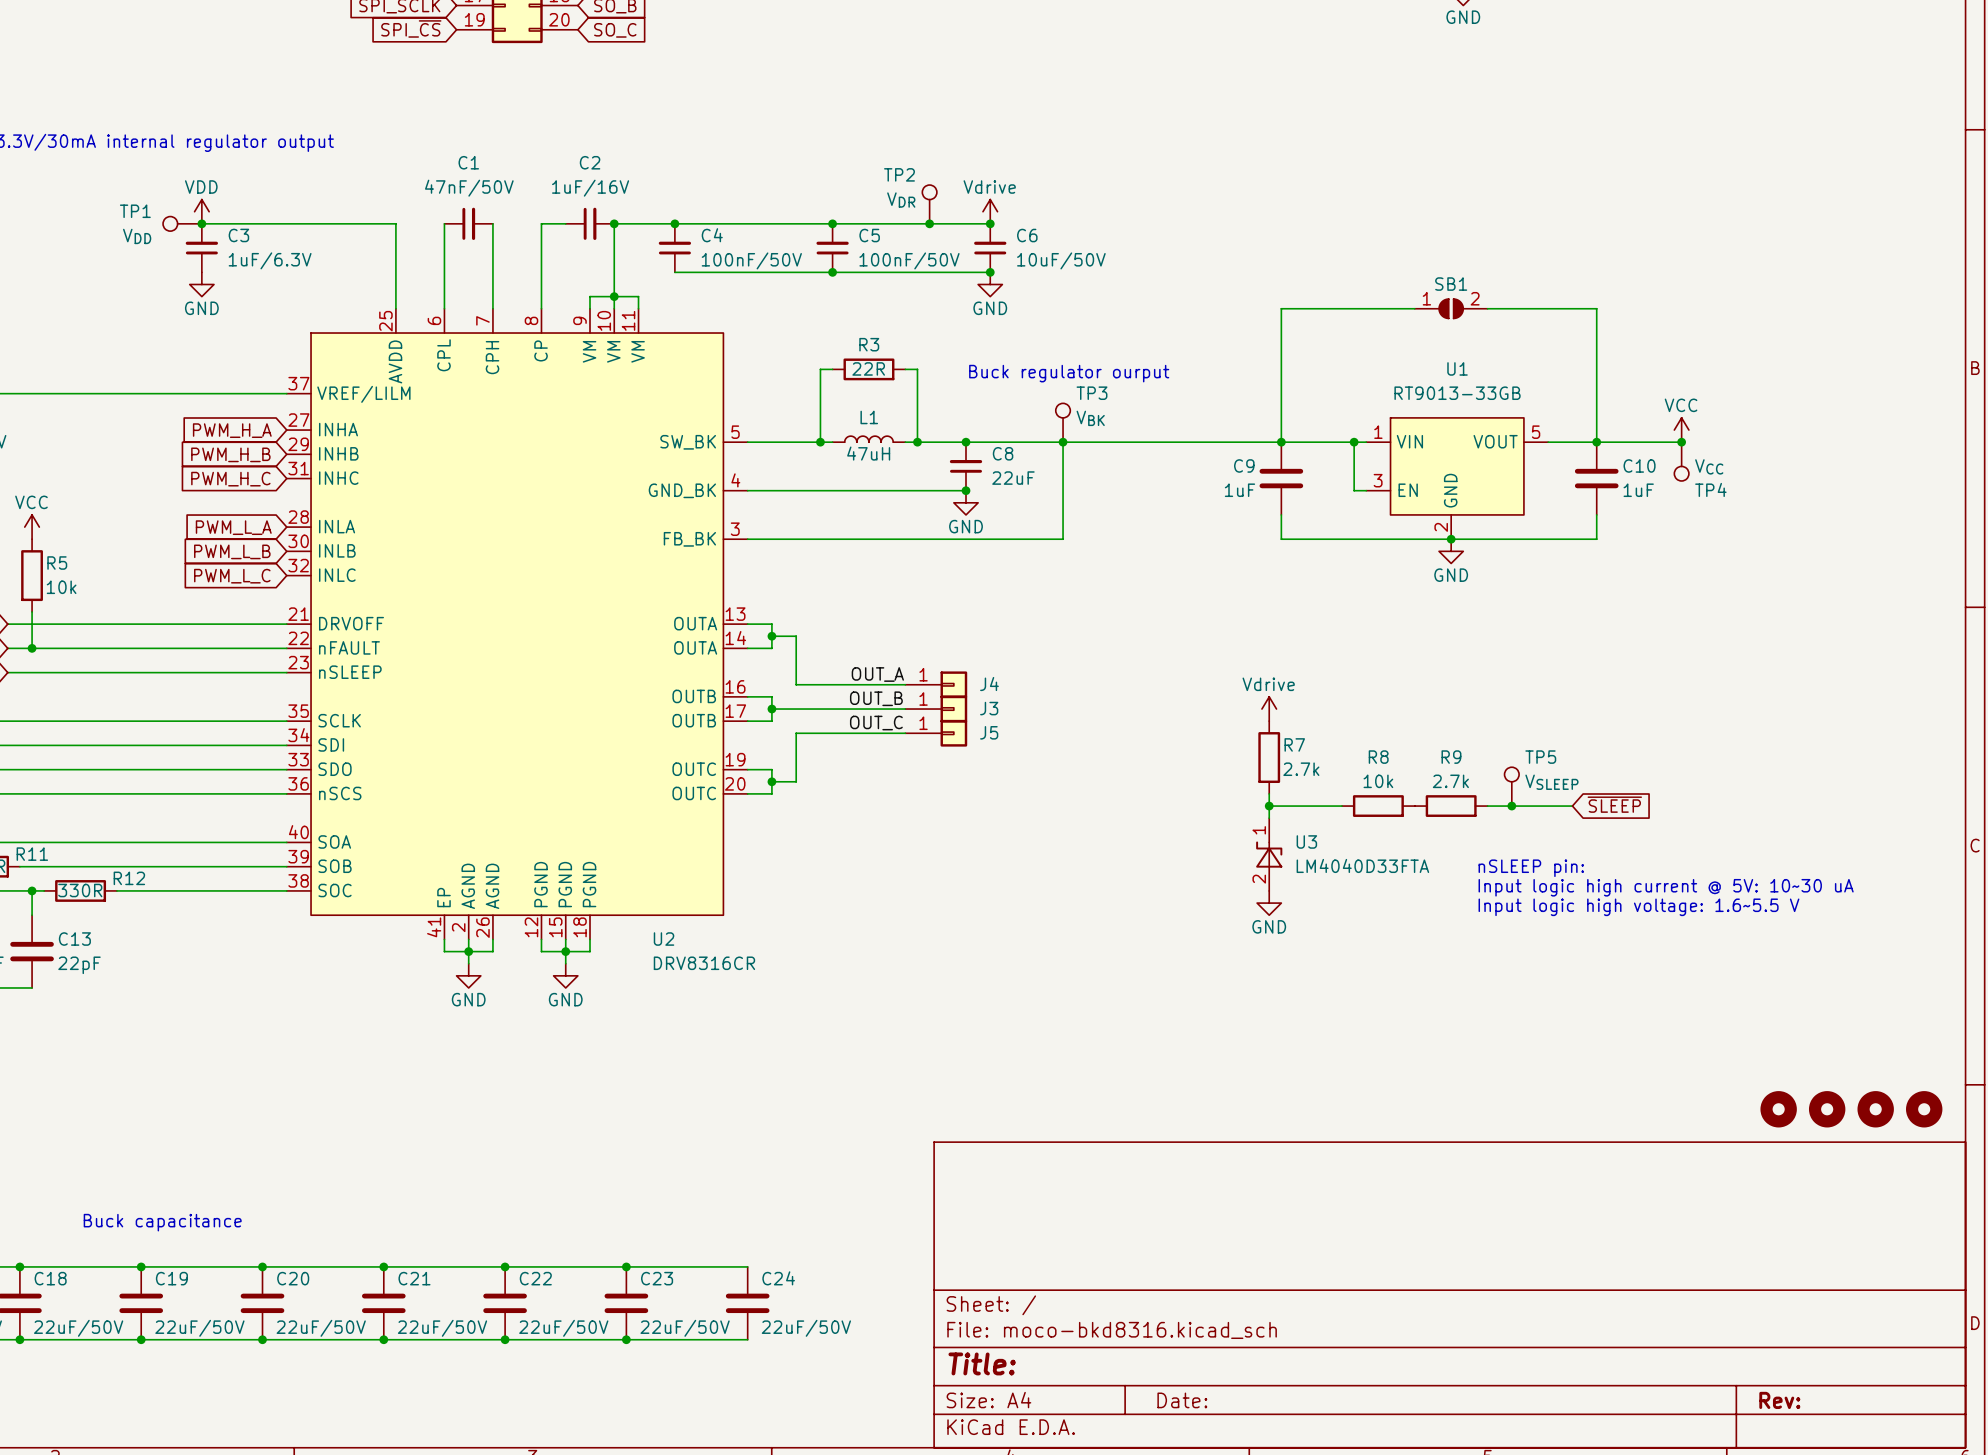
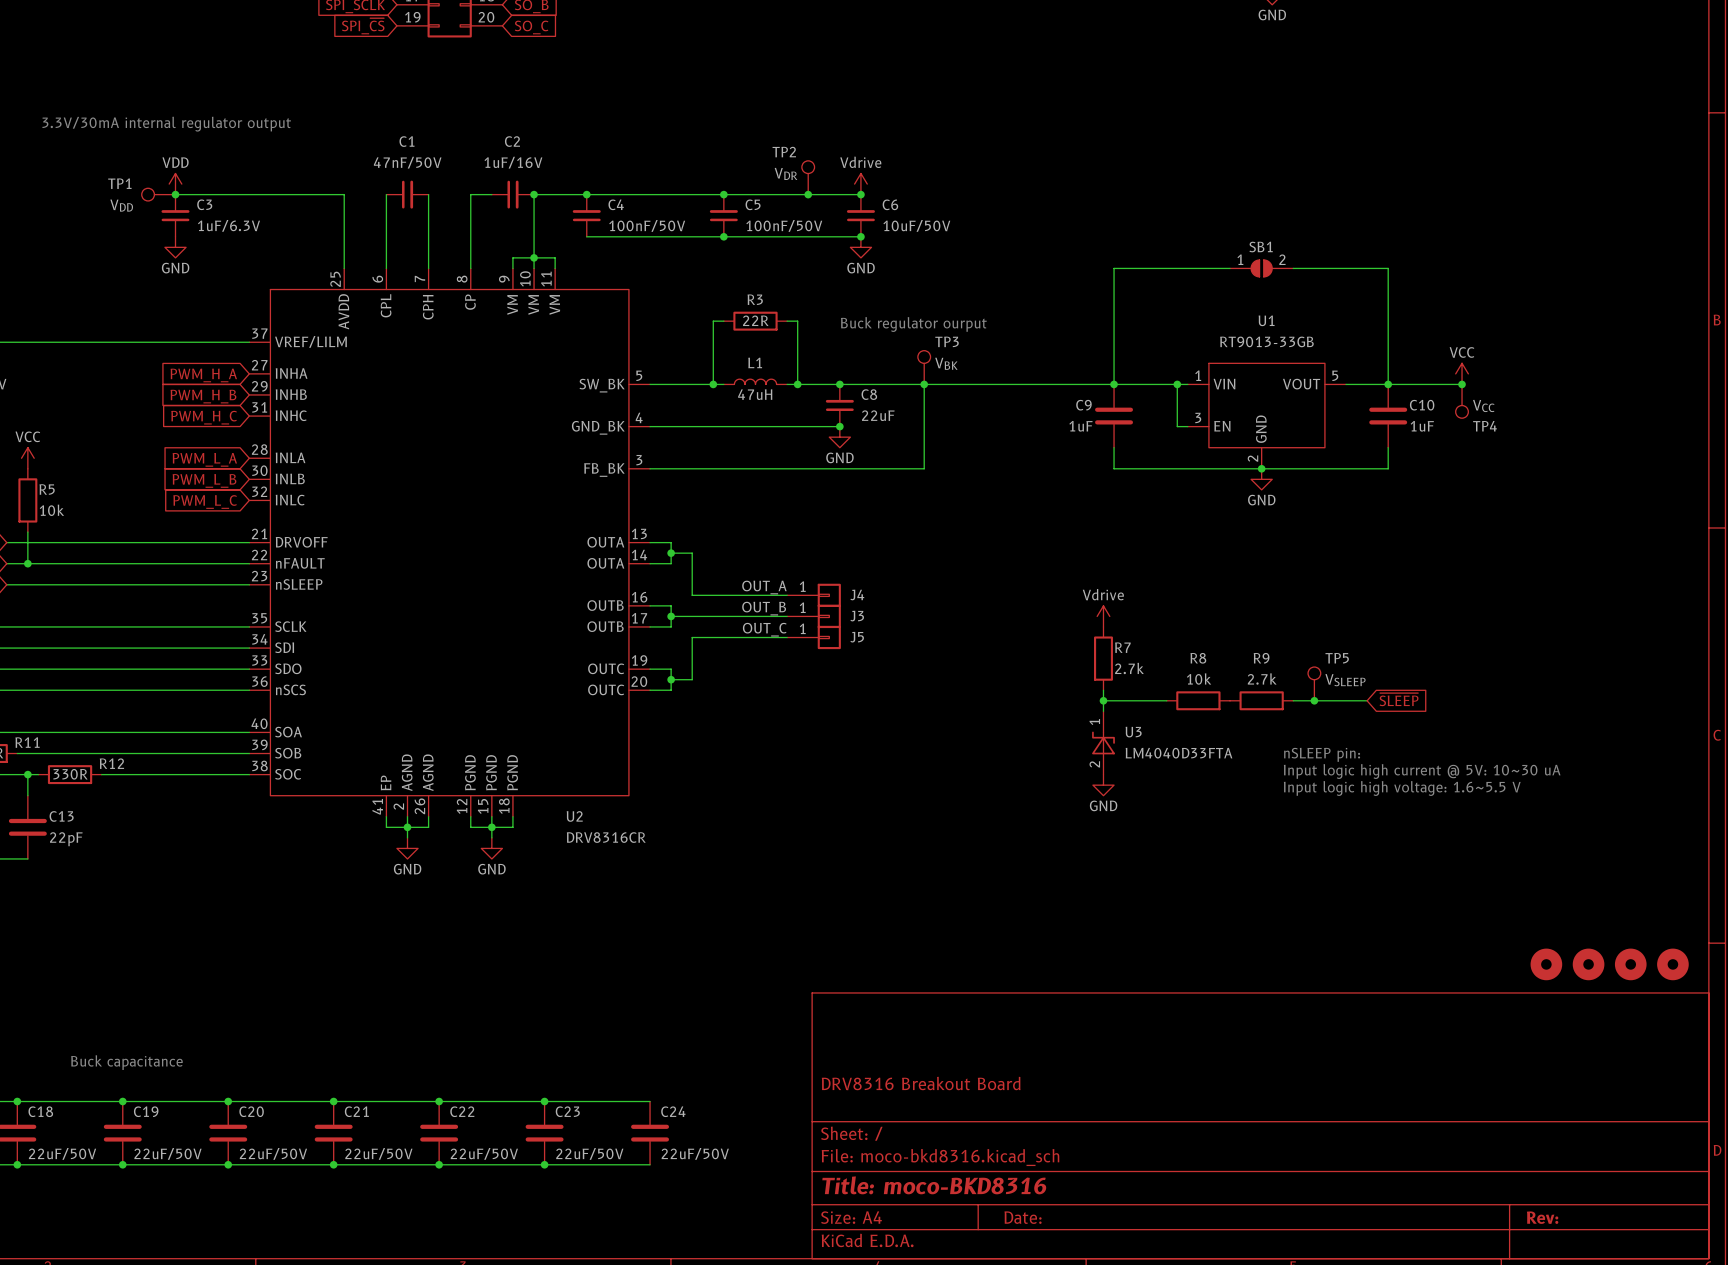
title block: none -> DRV8316 Breakout Board (921, 1083)
title block: Title: (982, 1363) -> Title: moco-BKD8316 (934, 1185)

